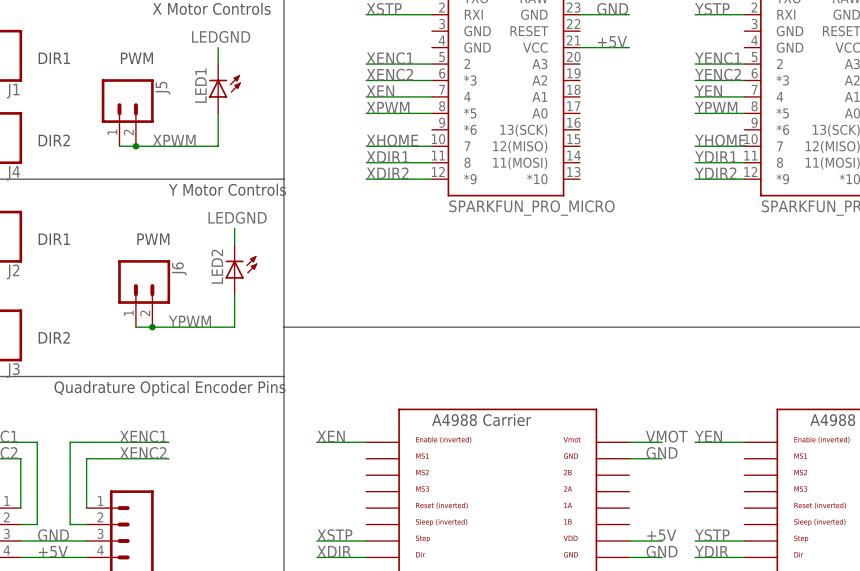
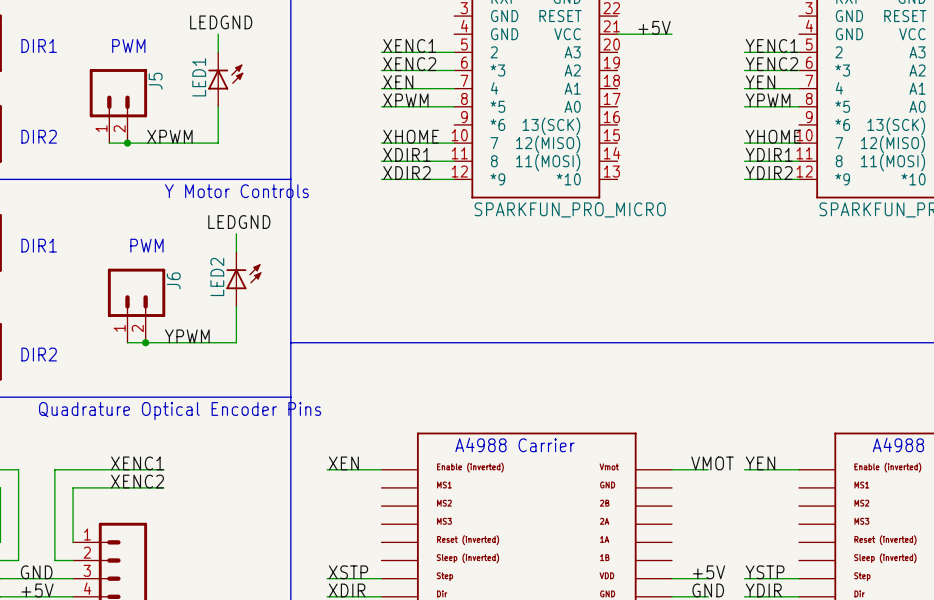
label: GND (662, 453) -> none
wire: (629, 458) (662, 458) -> none

